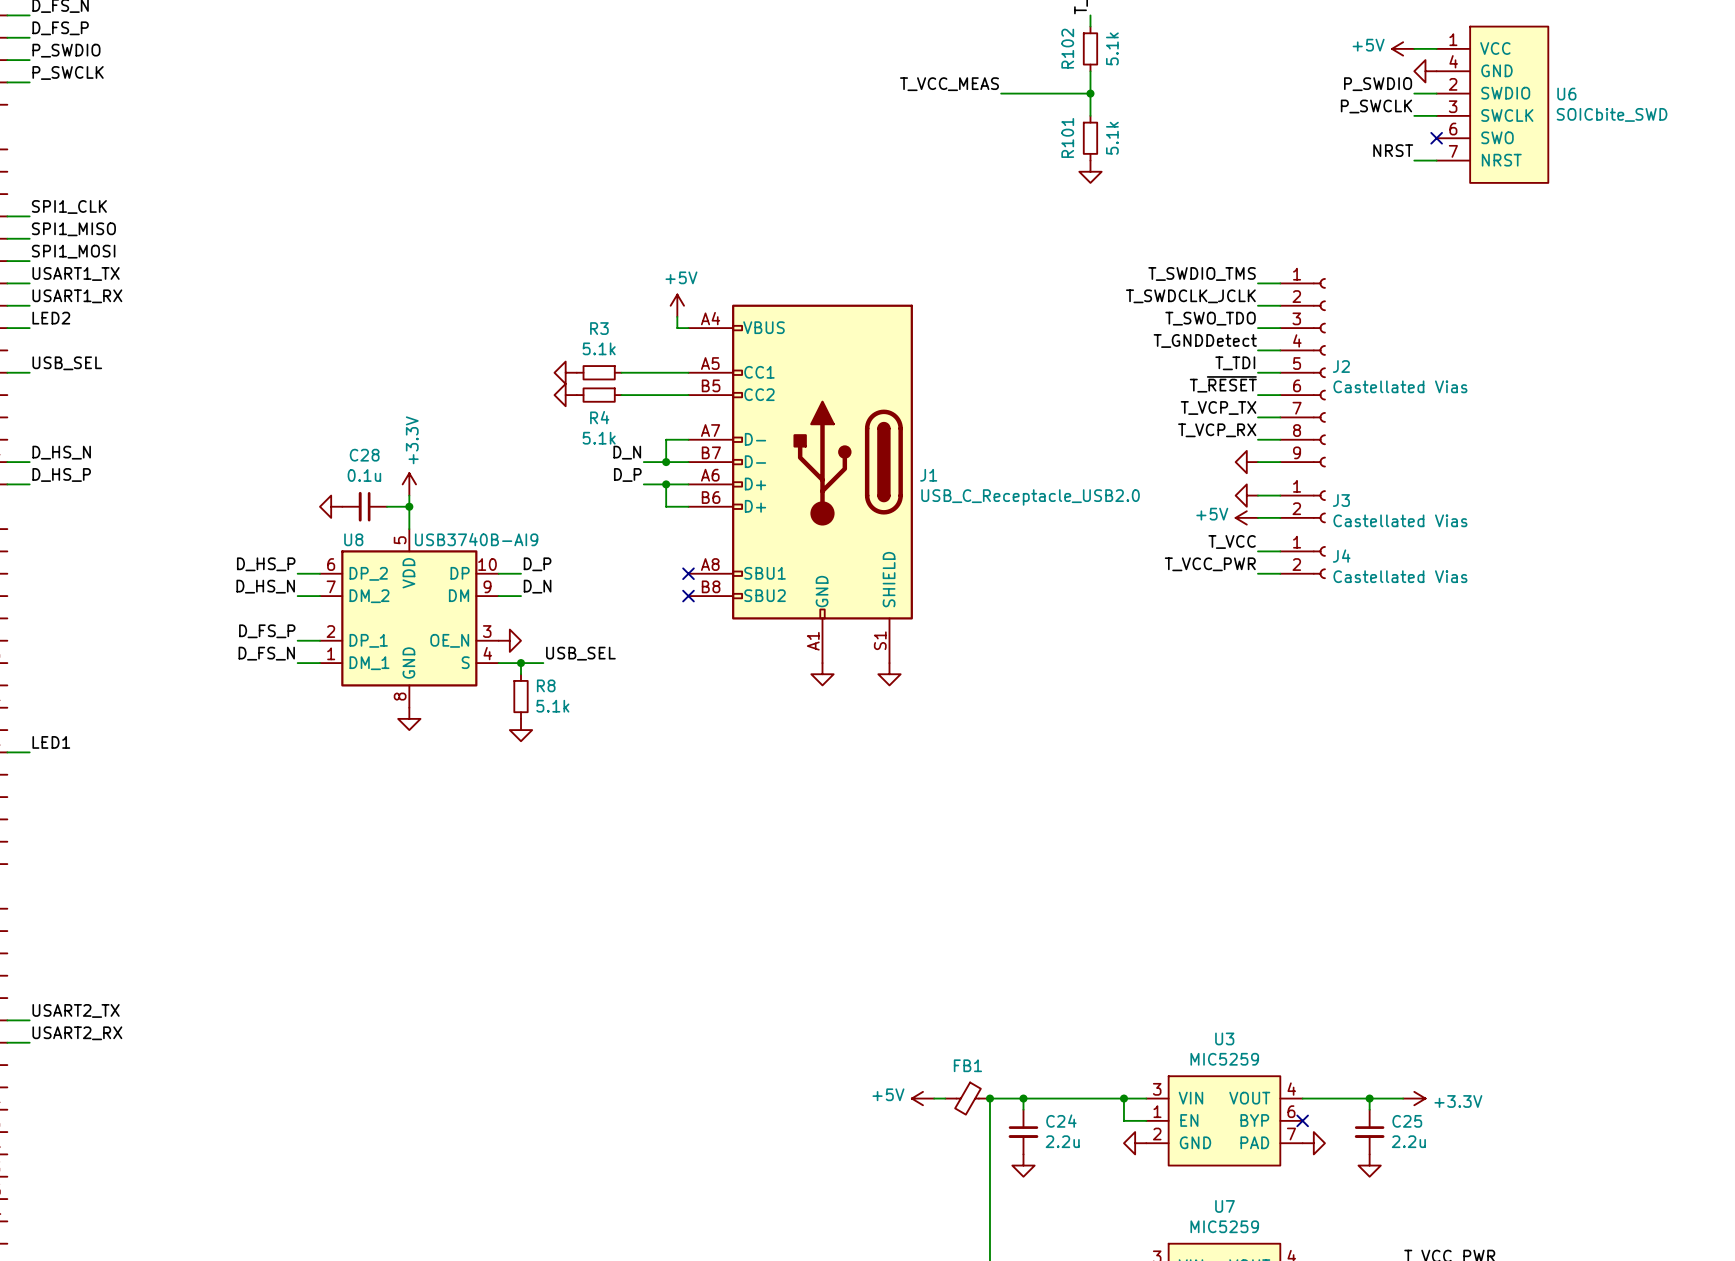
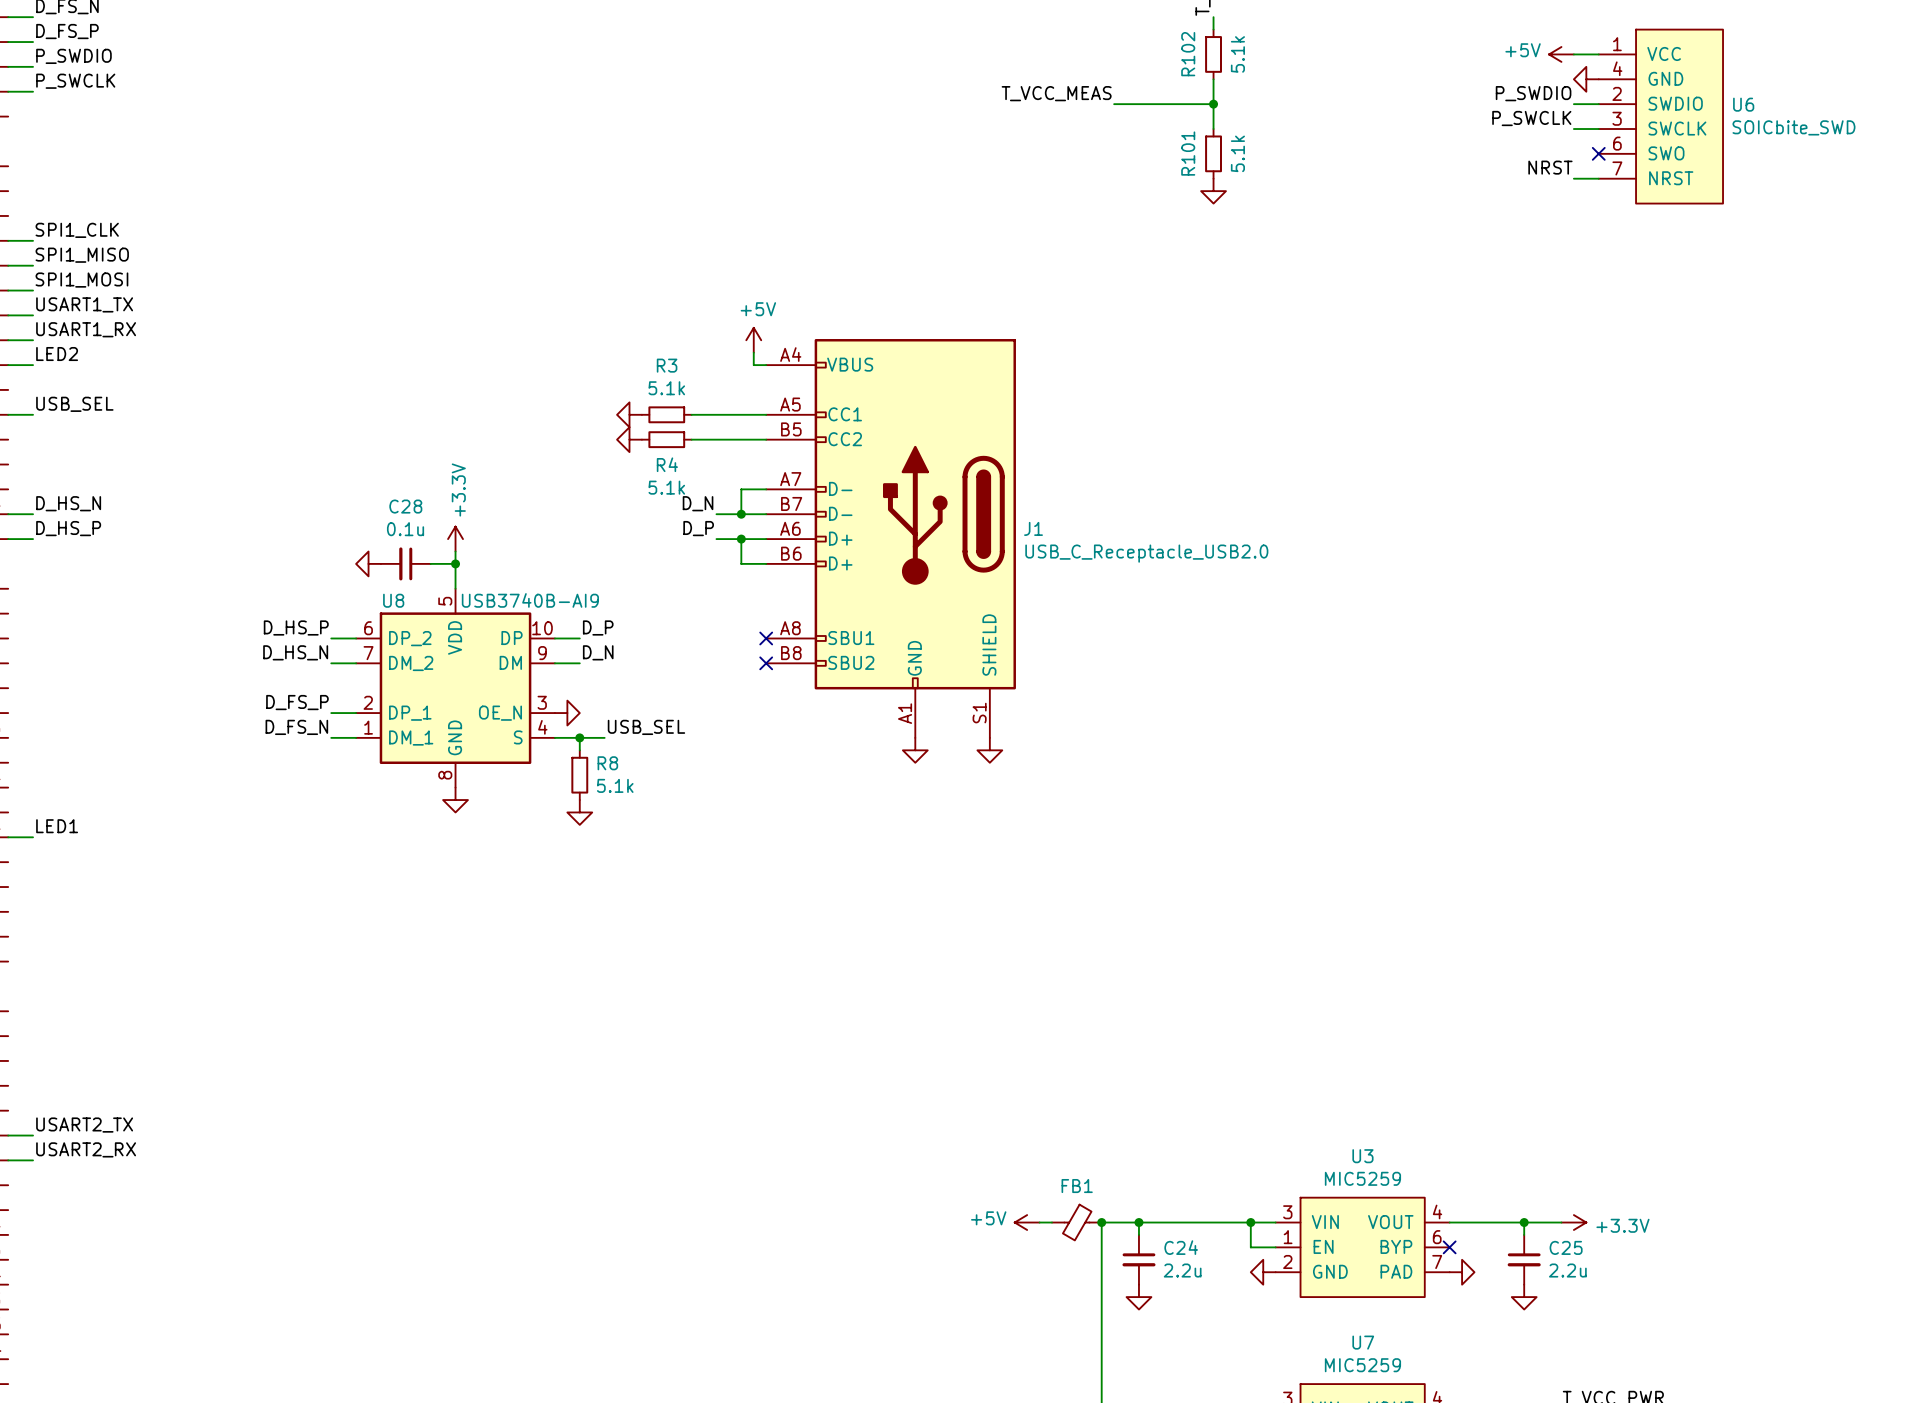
label: T_SWDIO_TMS (1202, 273) -> none
wire: (1257, 283) (1280, 283) -> none
label: T_SWDCLK_JCLK (1190, 296) -> none
wire: (1257, 305) (1280, 305) -> none
label: T_SWO_TDO (1210, 318) -> none
wire: (1257, 328) (1280, 328) -> none
label: T_GNDDetect (1205, 340) -> none
wire: (1257, 350) (1280, 350) -> none
label: T_TDI (1235, 363) -> none
wire: (1257, 372) (1280, 372) -> none
J2: Castellated Vias (1302, 372) -> none
label: T_~{RESET} (1223, 384) -> none
wire: (1257, 395) (1280, 395) -> none
label: T_VCP_TX (1218, 407) -> none
wire: (1257, 417) (1280, 417) -> none
label: T_VCP_RX (1217, 430) -> none
wire: (1257, 439) (1280, 439) -> none
power symbol: (1246, 462) -> none
wire: (1257, 462) (1280, 462) -> none
power symbol: (1246, 495) -> none
wire: (1257, 495) (1280, 495) -> none
J3: Castellated Vias (1302, 506) -> none
power symbol: +5V (1246, 517) -> none
wire: (1257, 517) (1280, 517) -> none
label: T_VCC (1232, 541) -> none
wire: (1257, 551) (1280, 551) -> none
J4: Castellated Vias (1302, 562) -> none
label: T_VCC_PWR (1210, 564) -> none
wire: (1257, 573) (1280, 573) -> none

